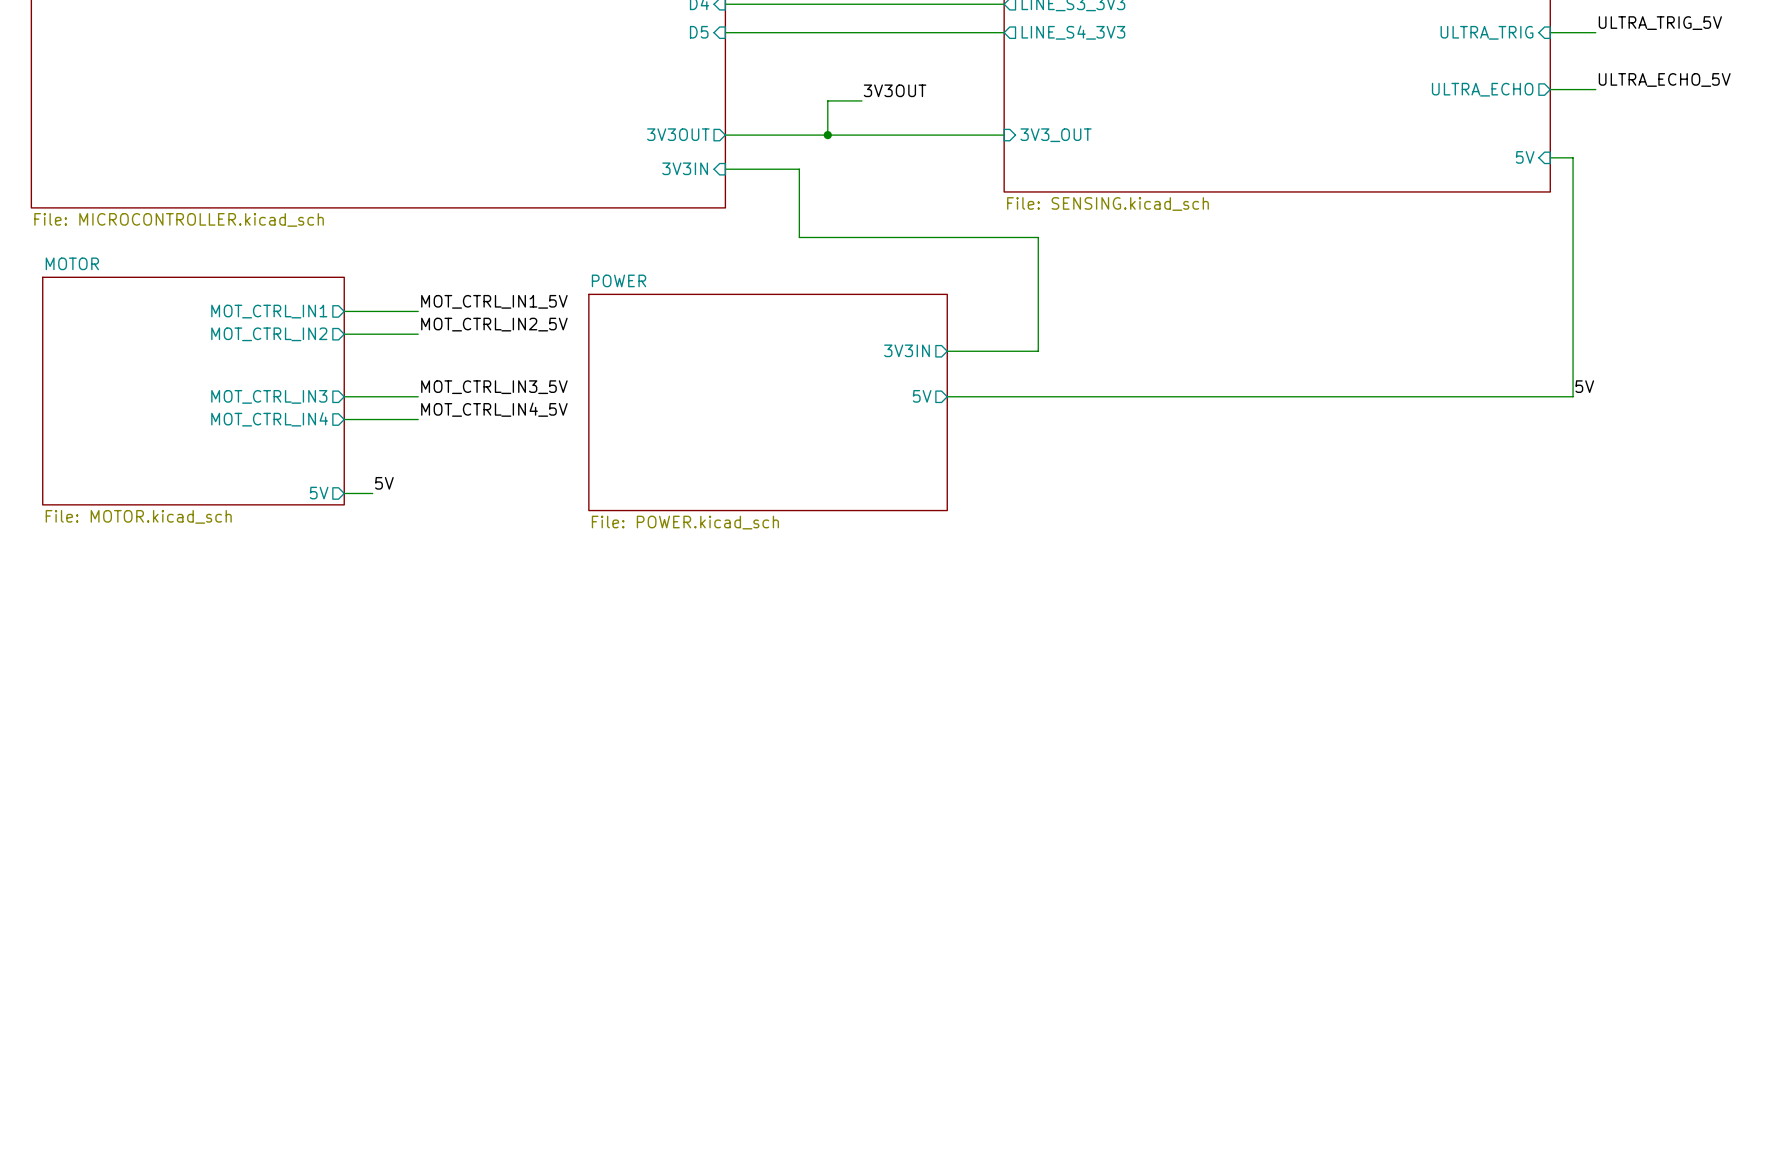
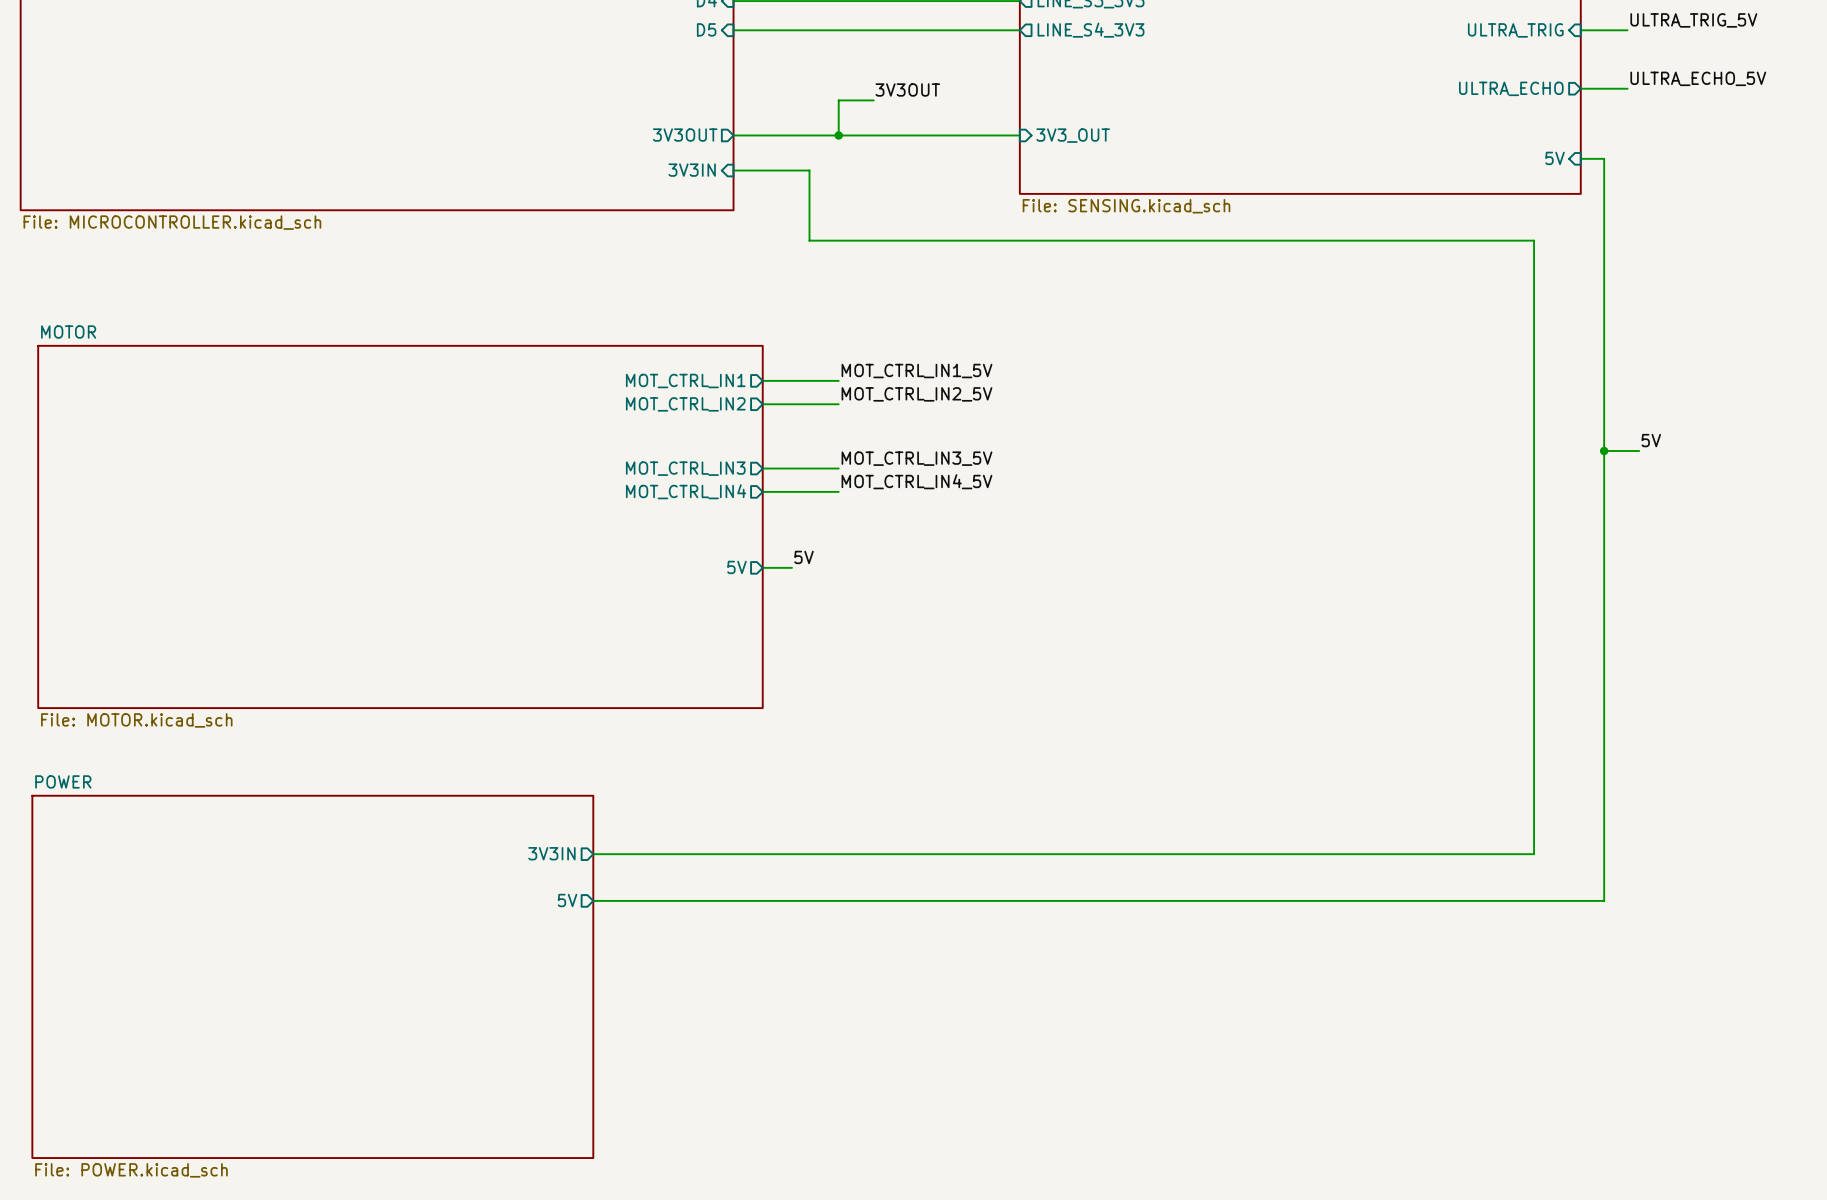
wire: (1038, 237) (1038, 351) (947, 351) -> (1054, 240) (1534, 240) (1534, 854) (593, 854)
label: MOT_CTRL_IN1_5V (494, 301) -> none
sheet pin: MOT_CTRL_IN1 (269, 311) -> none
wire: (344, 311) (418, 311) -> none
label: MOT_CTRL_IN2_5V (494, 324) -> none
sheet pin: MOT_CTRL_IN2 (269, 334) -> none
wire: (344, 334) (418, 334) -> none
sheet pin: 3V3IN (906, 350) -> none
label: none -> MOT_CTRL_IN1_5V (916, 371)
sheet pin: none -> MOT_CTRL_IN1 (685, 381)
wire: none -> (762, 380) (838, 380)
label position: 5V (1584, 386) -> 5V (1651, 440)
label: MOT_CTRL_IN3_5V (494, 387) -> none
label: none -> MOT_CTRL_IN2_5V (916, 394)
sheet MOTOR: File: MOTOR.kicad_sch (193, 391) -> none
sheet pin: MOT_CTRL_IN3 (269, 396) -> none
wire: (344, 396) (418, 396) -> none
sheet pin: none -> MOT_CTRL_IN2 (685, 404)
wire: none -> (762, 404) (838, 404)
sheet pin: 5V (922, 396) -> none
wire: (947, 396) (1573, 396) -> (593, 900) (1604, 900) (1604, 404)
sheet POWER: File: POWER.kicad_sch (768, 402) -> none
label: MOT_CTRL_IN4_5V (494, 409) -> none
sheet pin: MOT_CTRL_IN4 (269, 419) -> none
wire: (344, 419) (418, 419) -> none
wire: none -> (1604, 451) (1639, 451)
junction: none -> (1604, 451)
label: none -> MOT_CTRL_IN3_5V (916, 458)
sheet pin: none -> MOT_CTRL_IN3 (685, 468)
wire: none -> (762, 468) (838, 468)
label: none -> MOT_CTRL_IN4_5V (916, 481)
sheet pin: none -> MOT_CTRL_IN4 (686, 491)
wire: none -> (762, 491) (838, 491)
label: 5V (384, 483) -> none
sheet pin: 5V (319, 493) -> none
wire: (344, 493) (372, 493) -> none
sheet MOTOR: none -> File: MOTOR.kicad_sch (400, 526)
label: none -> 5V (804, 557)
sheet pin: none -> 5V (736, 567)
wire: none -> (762, 567) (791, 567)
sheet pin: none -> 3V3IN (551, 853)
sheet pin: none -> 5V (567, 900)
sheet POWER: none -> File: POWER.kicad_sch (312, 976)

